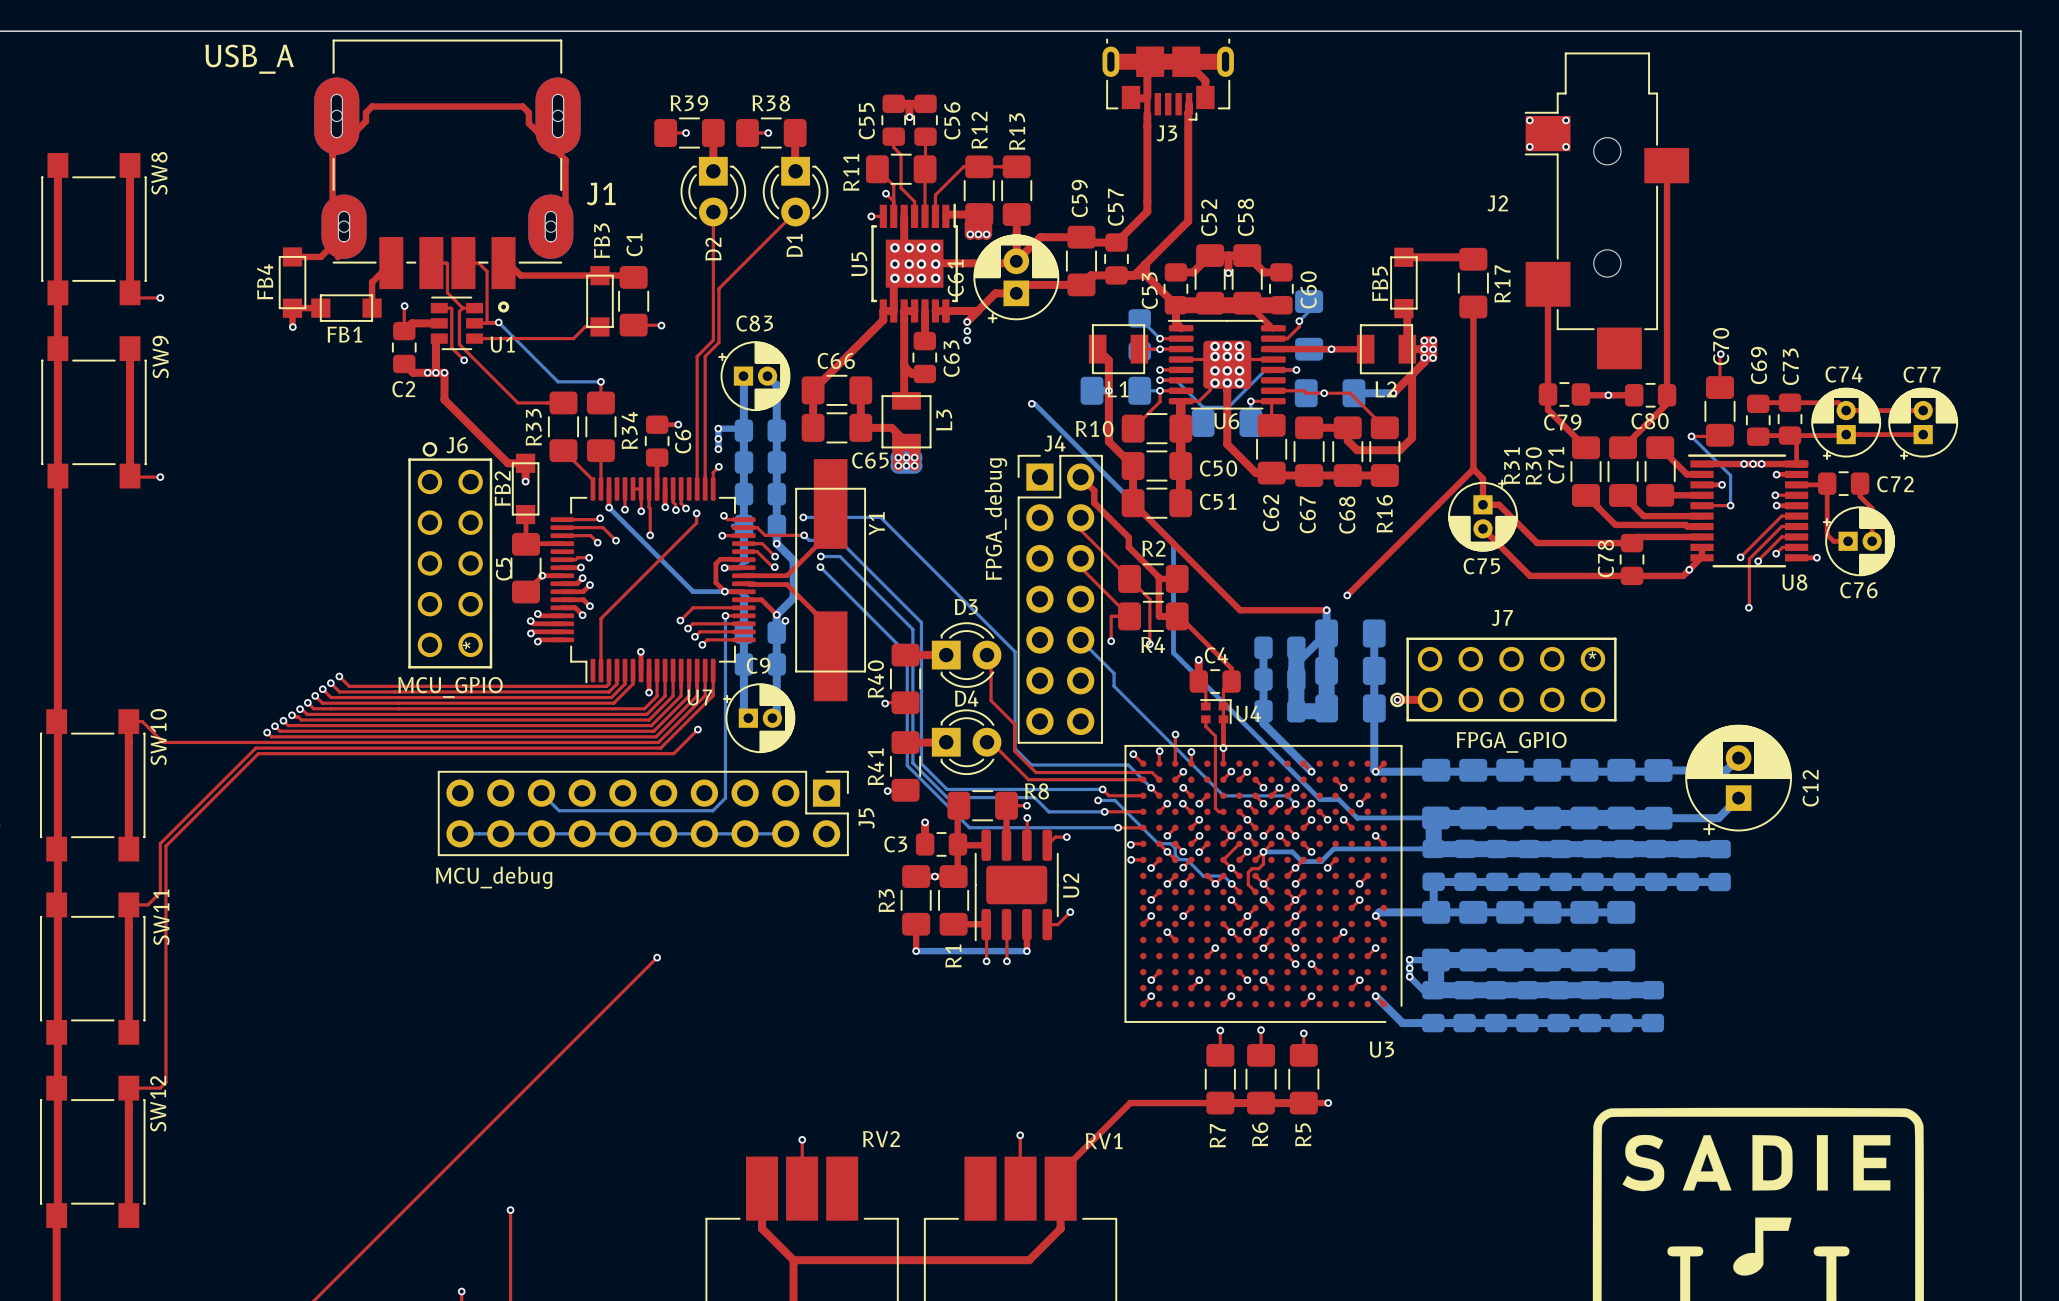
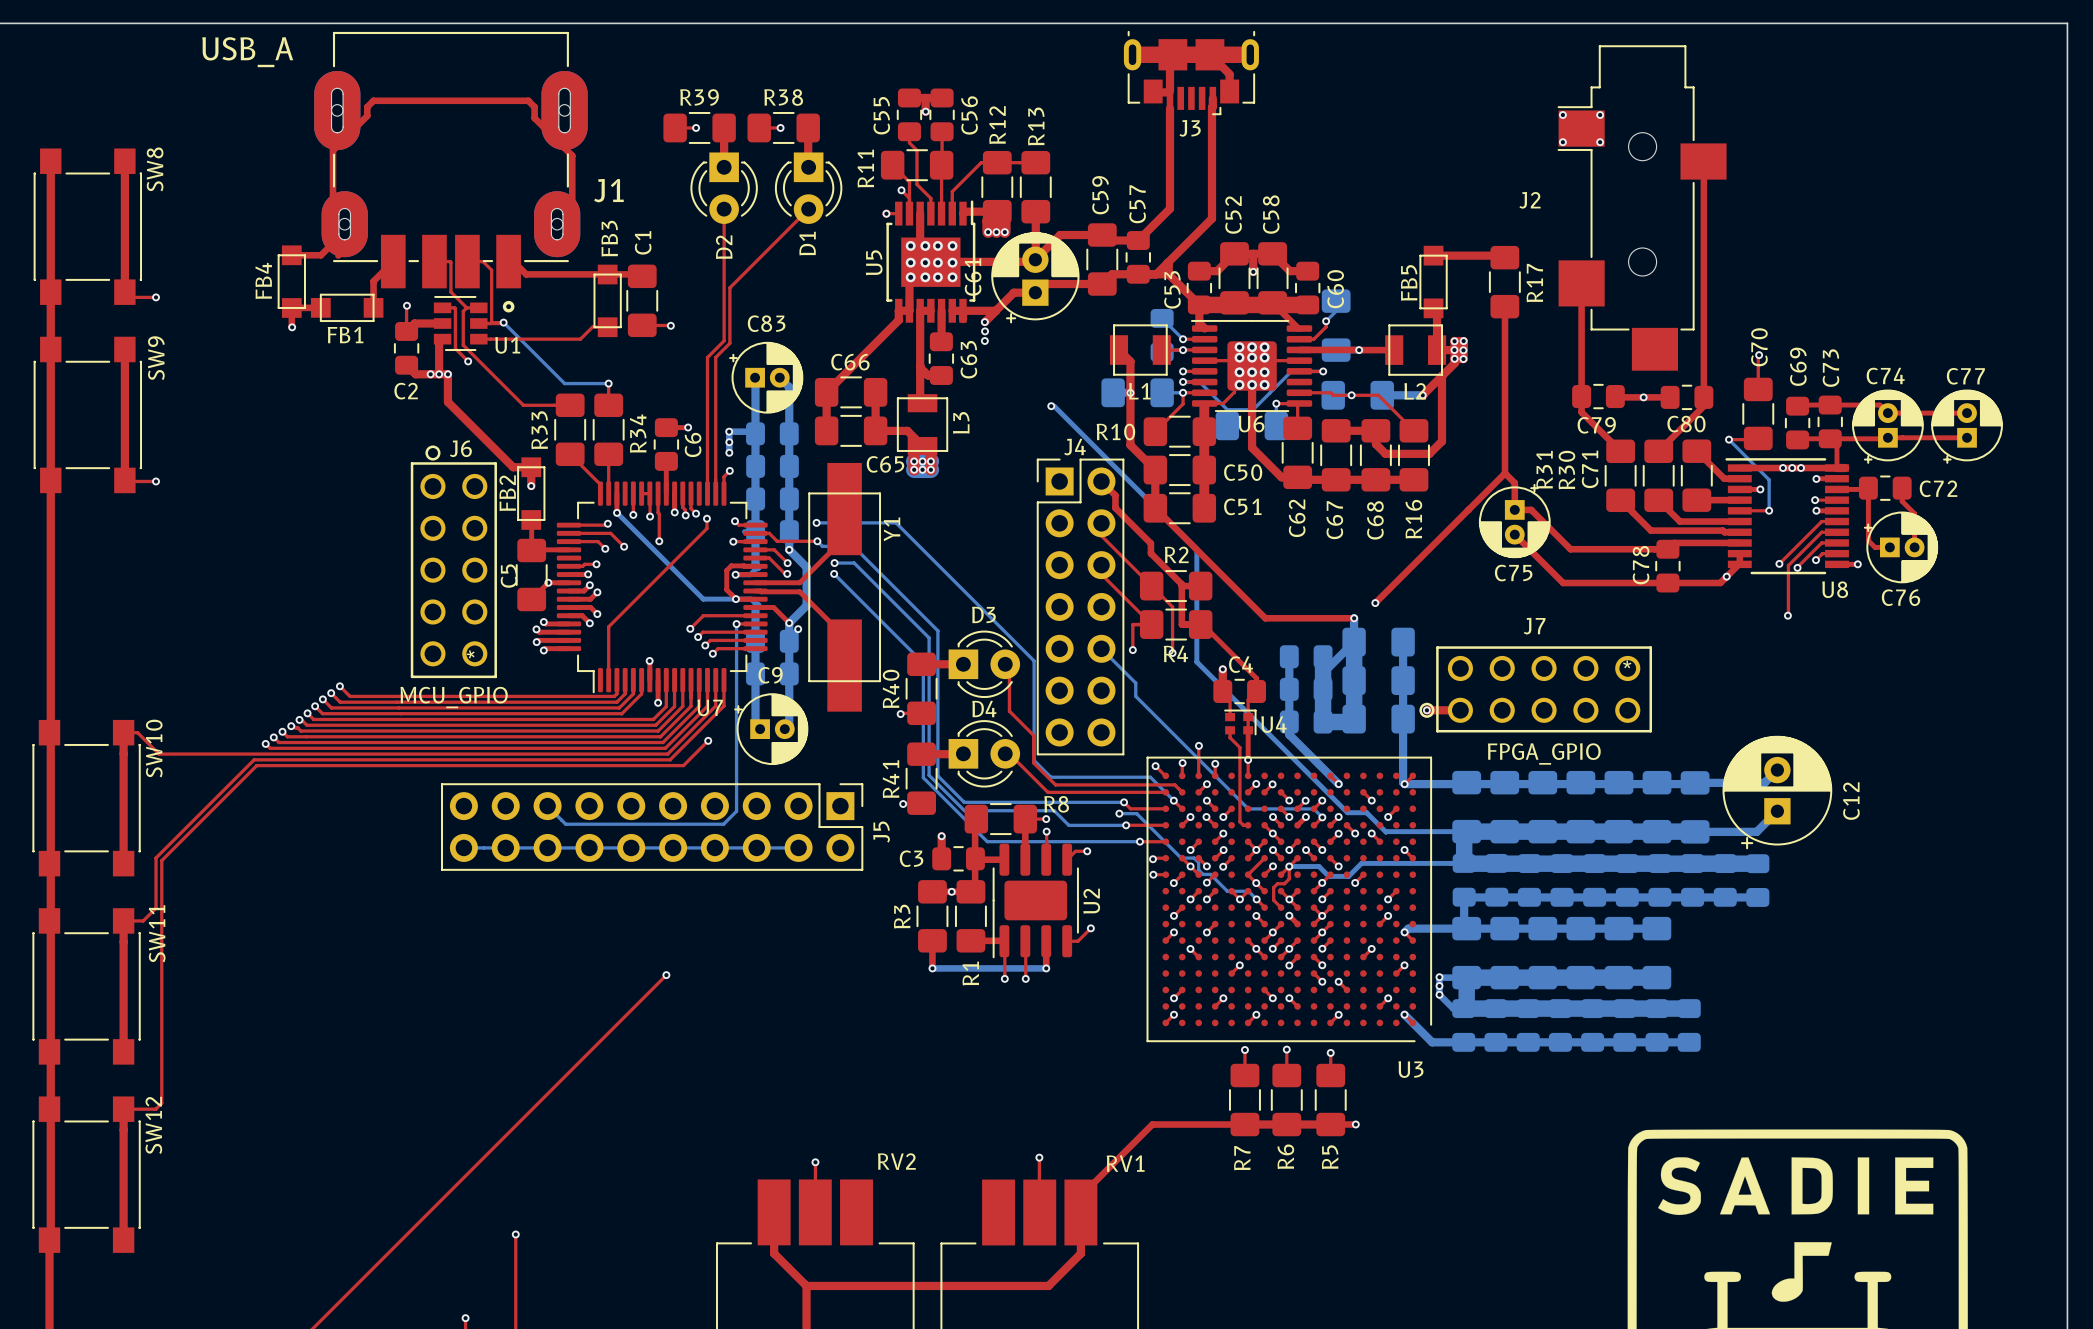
J4 value: FPGA_debug (995, 519) -> none
J5 value: MCU_debug (494, 877) -> none

